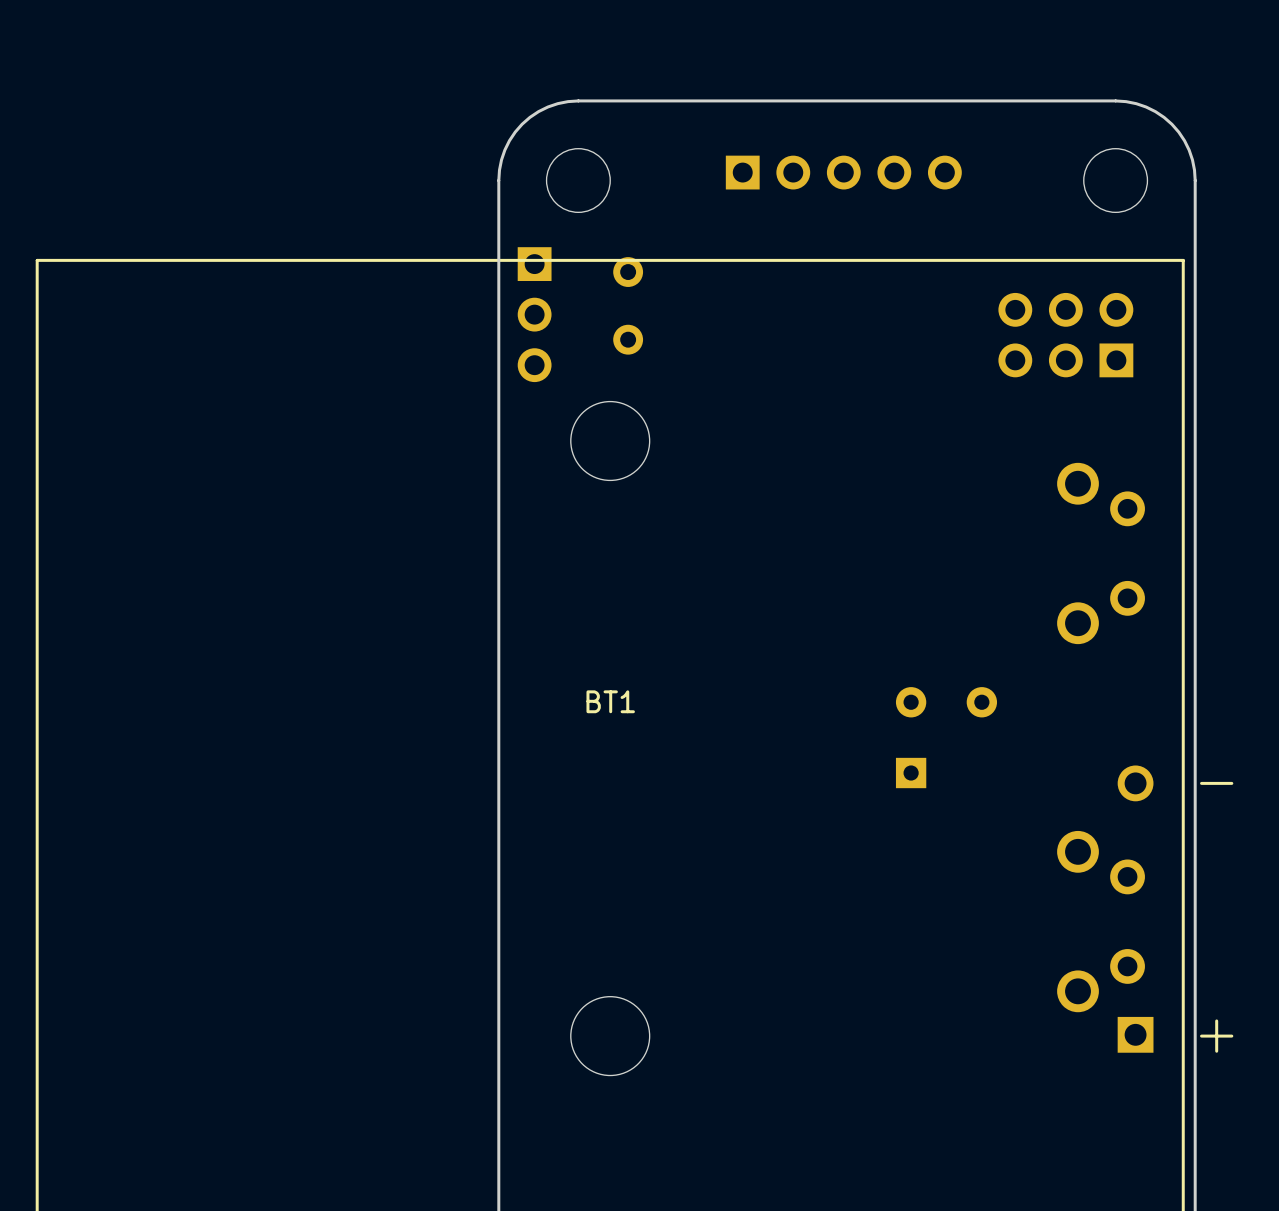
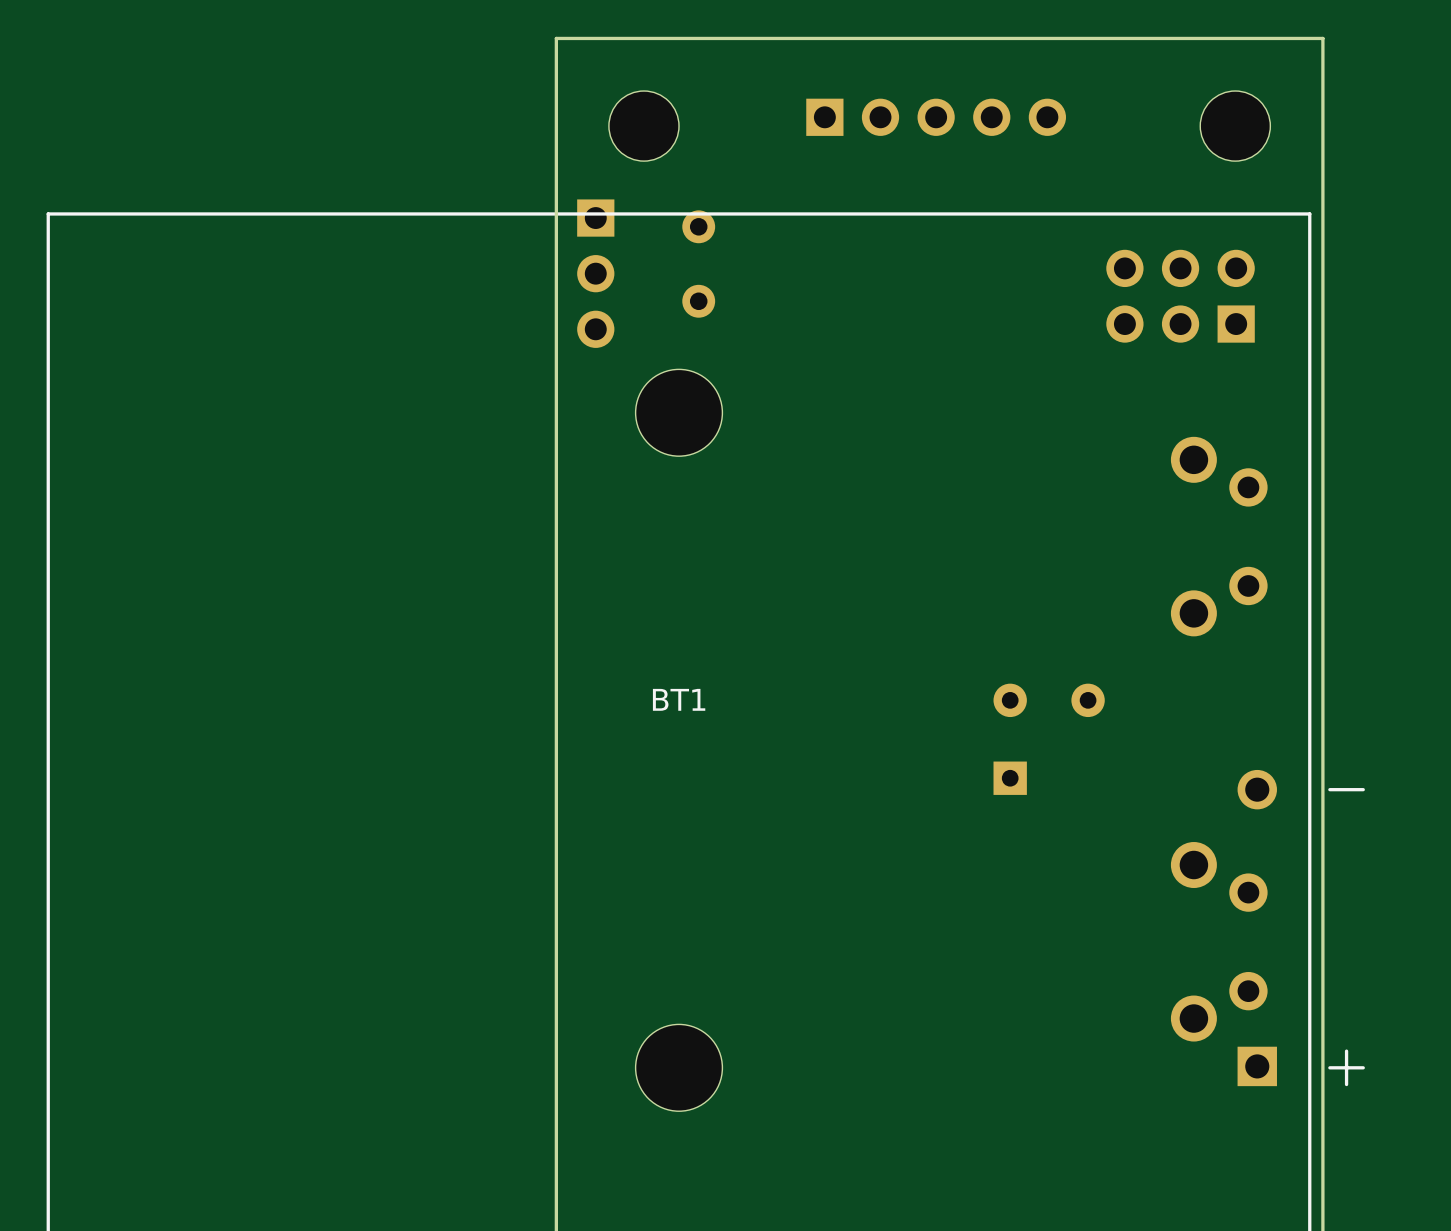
board edge: (578, 100) (547, 106) (522, 124) (504, 150) (498, 180) -> (643, 38) (556, 38) (556, 126)
board edge: (1115, 100) (1146, 107) (1171, 124) (1189, 150) (1195, 180) -> (1235, 38) (1322, 38) (1322, 126)

